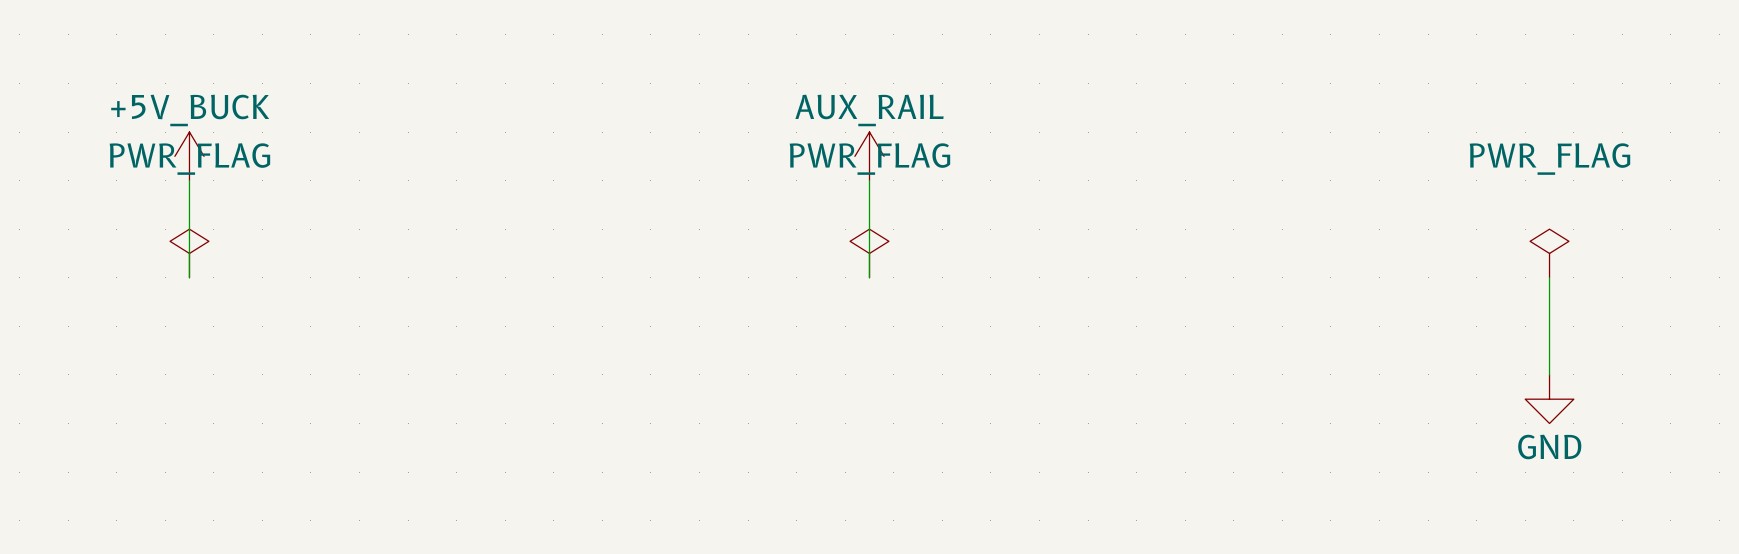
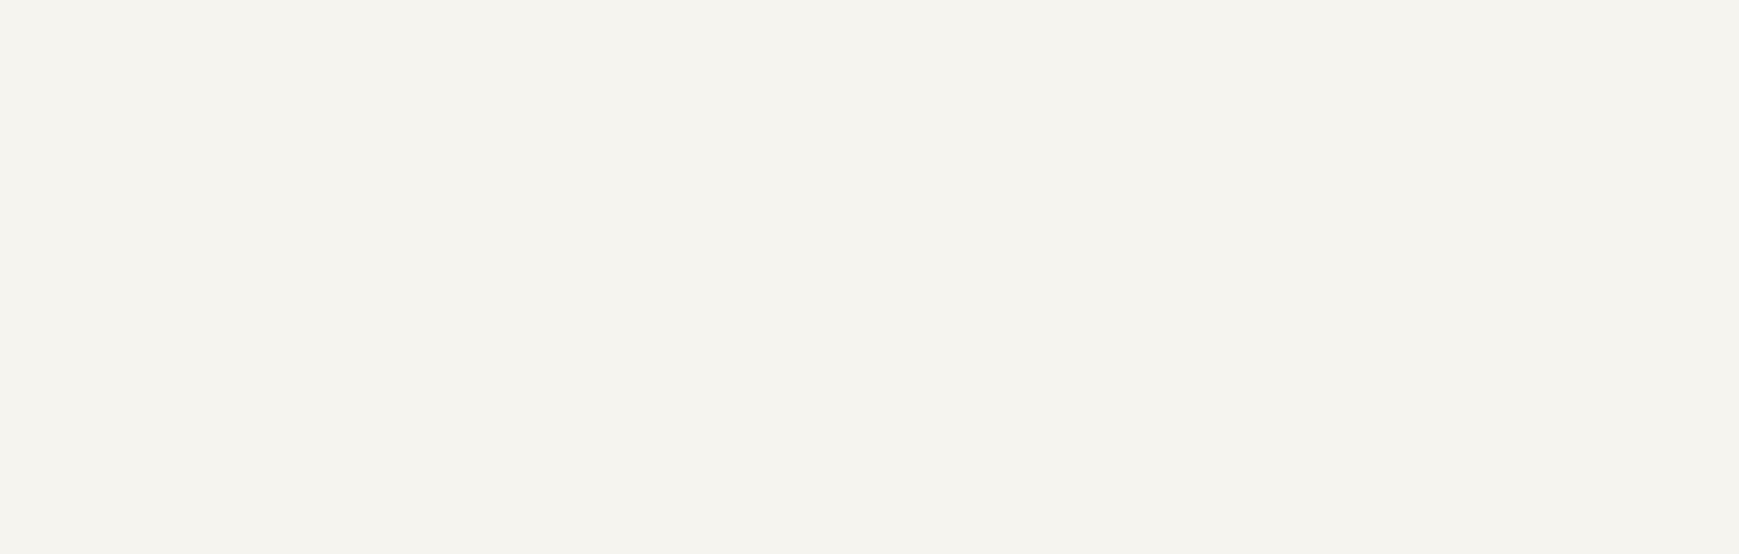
power symbol: +5V_BUCK (189, 156) -> none
power symbol: AUX_RAIL (869, 156) -> none
wire: (189, 180) (189, 277) -> none
wire: (869, 180) (869, 277) -> none
power symbol: PWR_FLAG (189, 253) -> none
power symbol: PWR_FLAG (869, 253) -> none
power symbol: PWR_FLAG (1549, 253) -> none
wire: (1549, 277) (1549, 374) -> none
power symbol: GND (1549, 399) -> none

